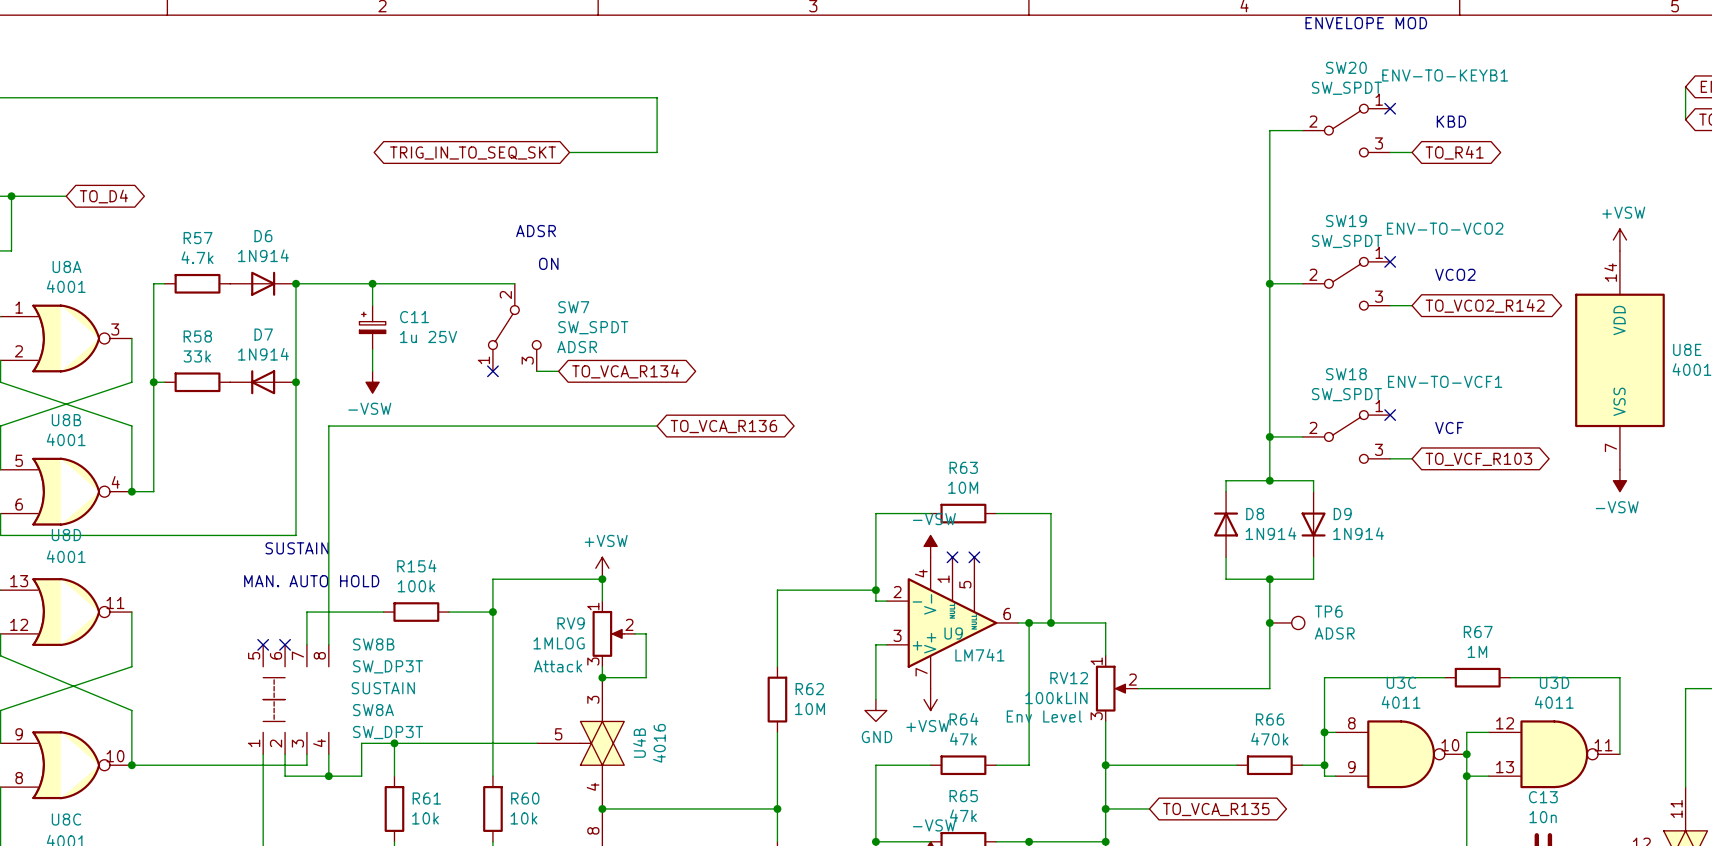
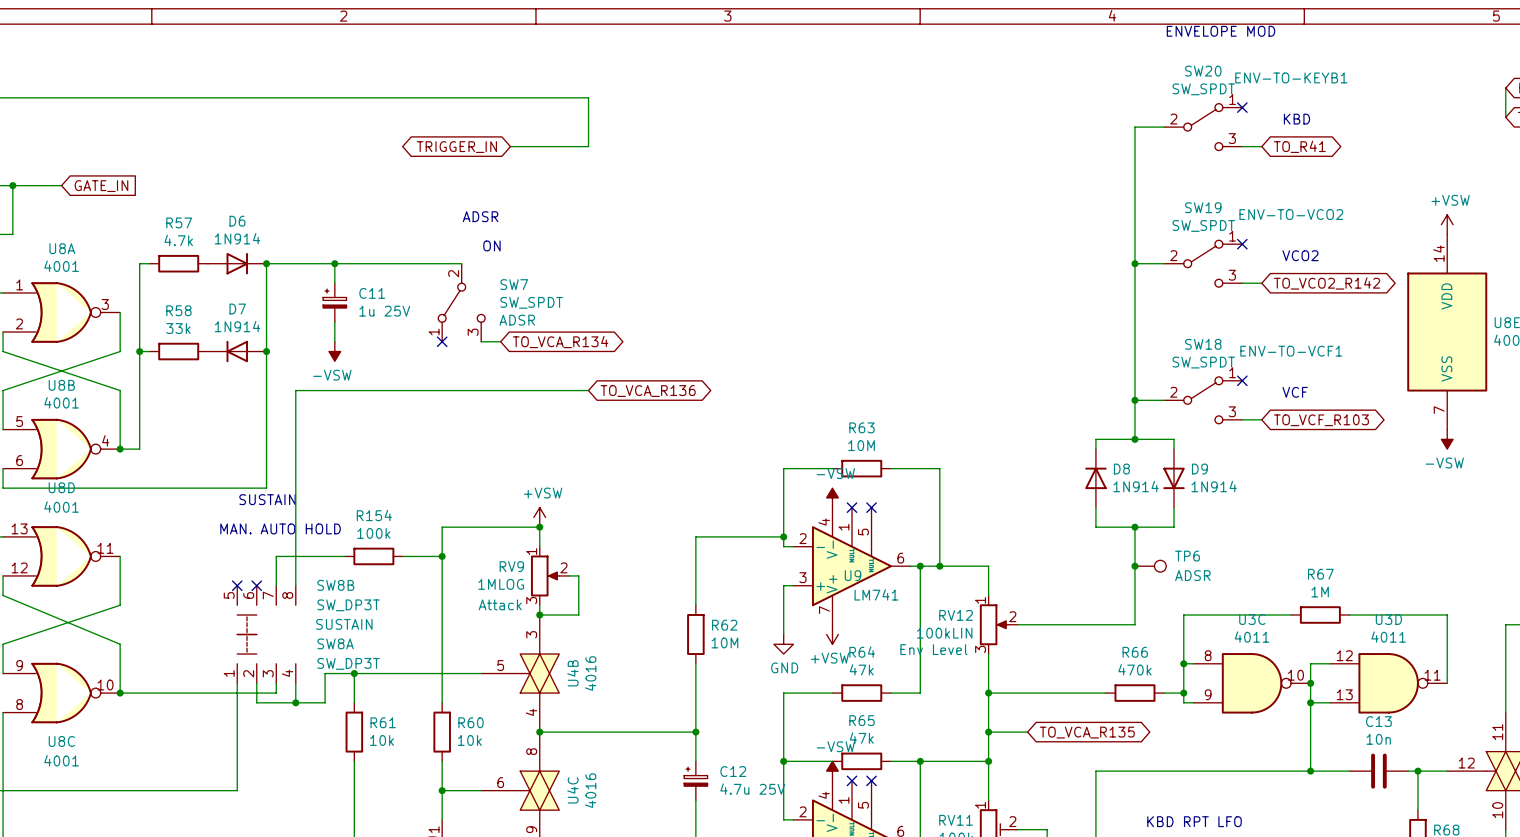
global label: TRIG_IN_TO_SEQ_SKT (473, 153) -> TRIGGER_IN (456, 147)
global label shape: bidirectional (103, 196) -> input (101, 186)
global label: TO_D4 (103, 196) -> GATE_IN (101, 186)

